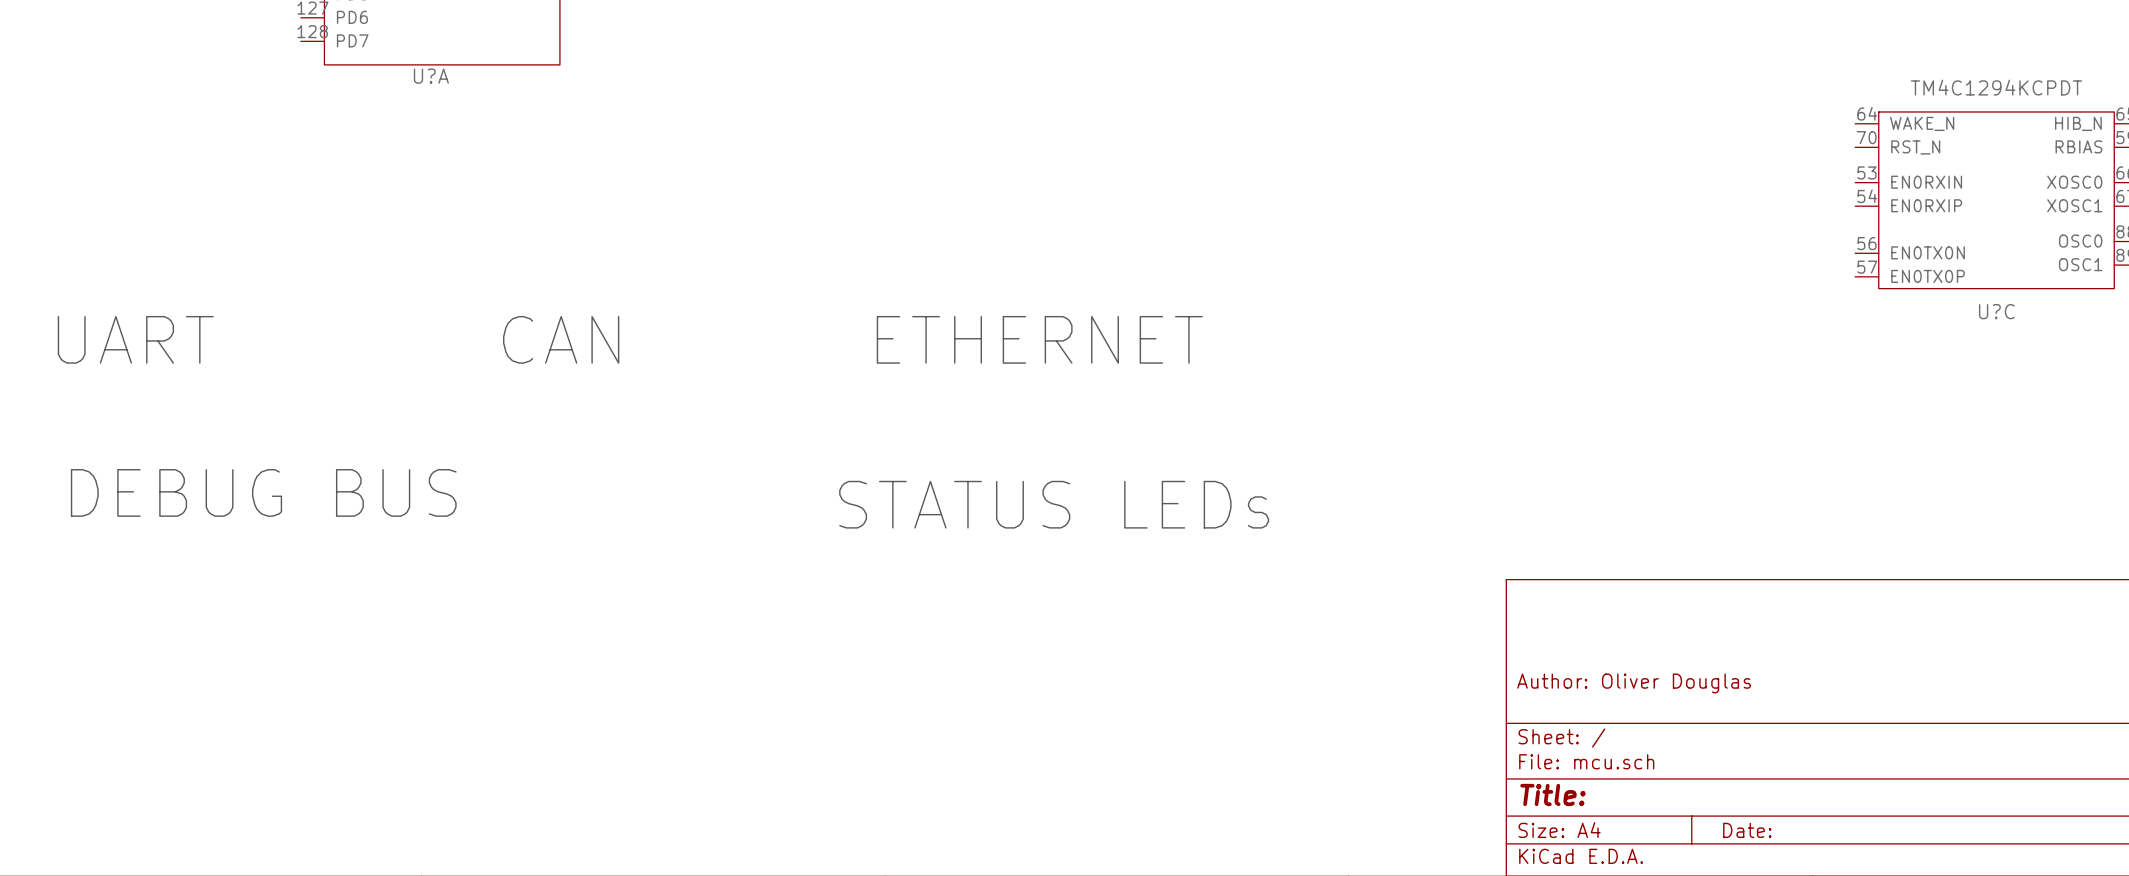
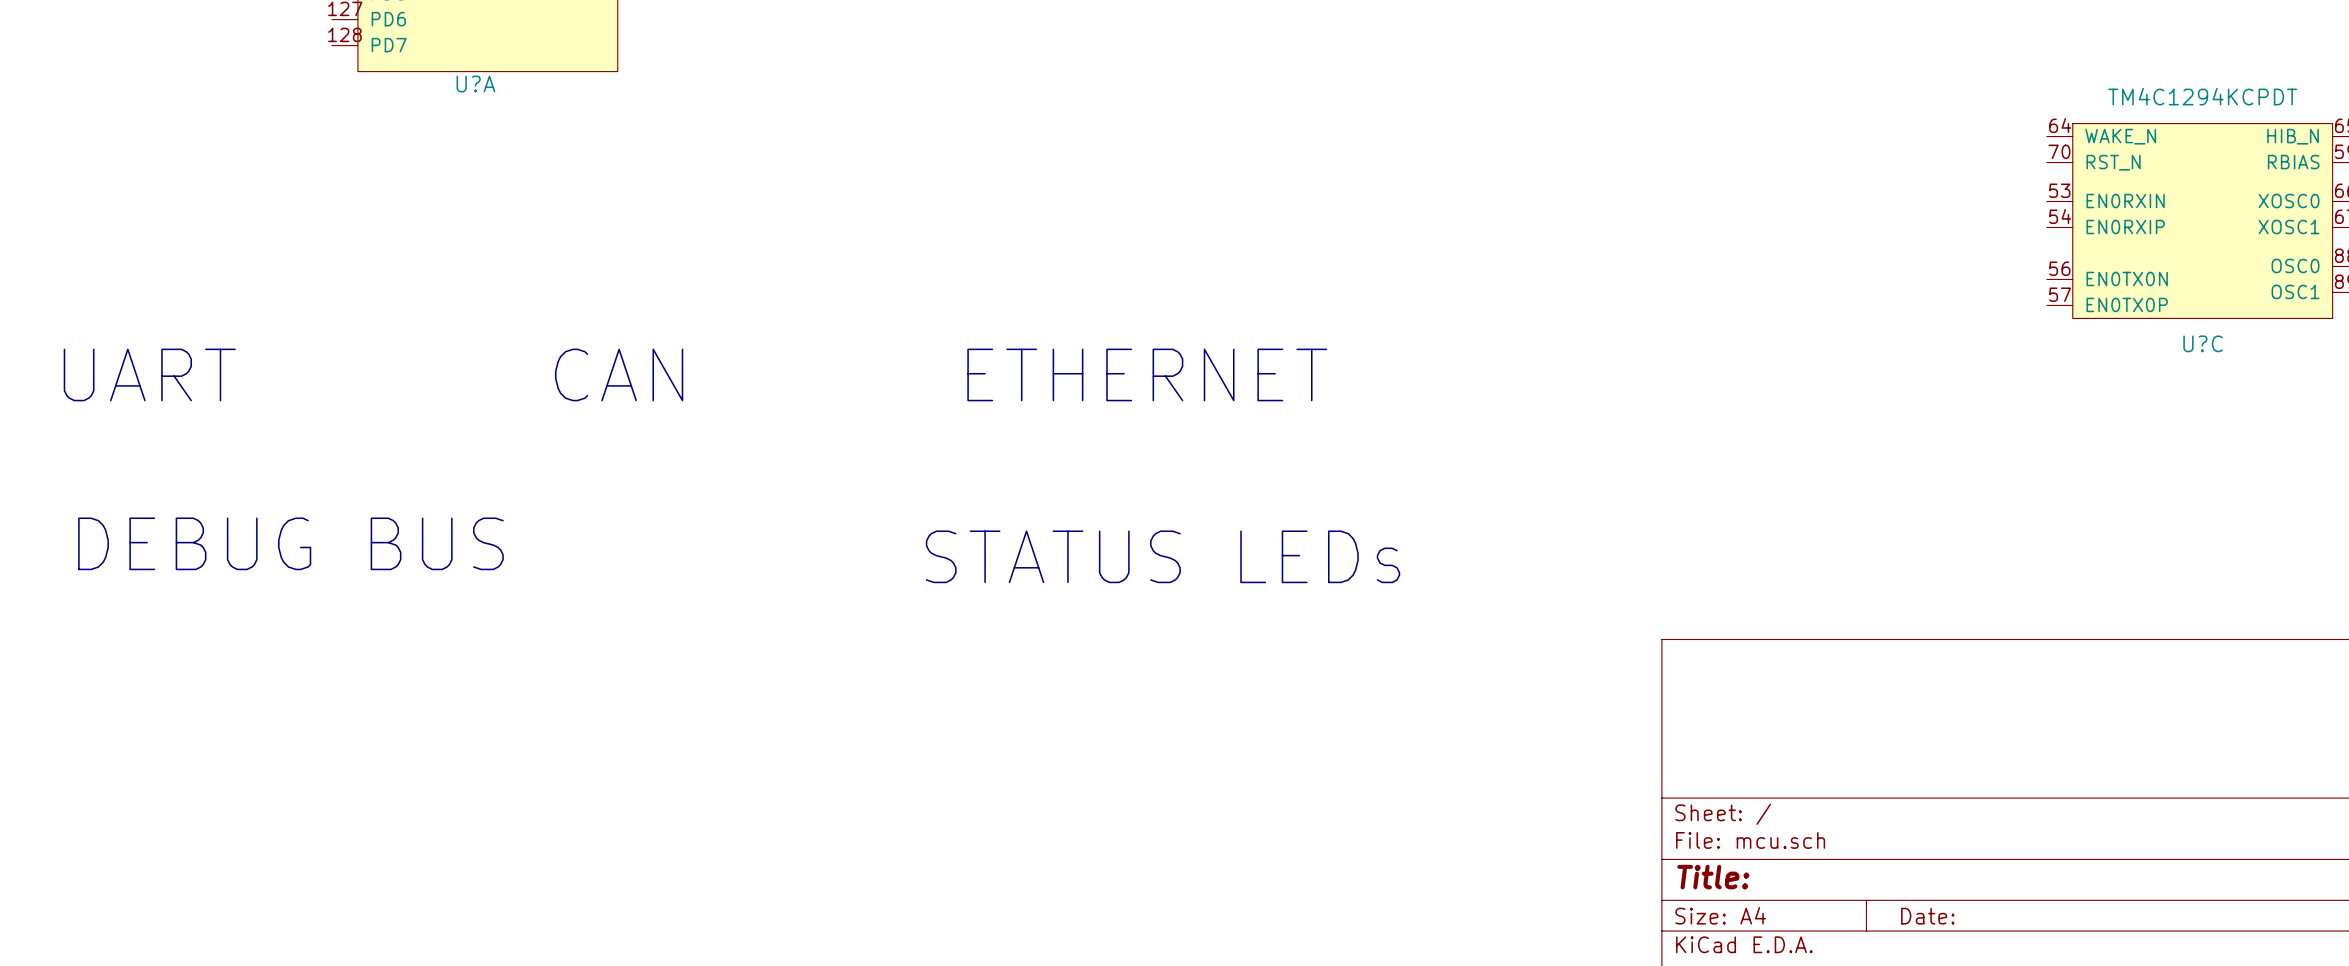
title block: Author: Oliver Douglas (1634, 683) -> none

